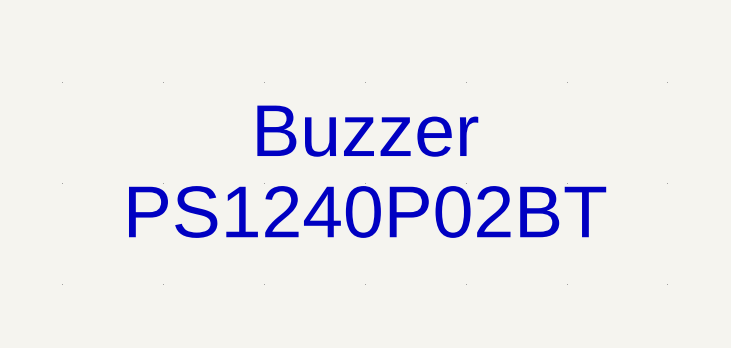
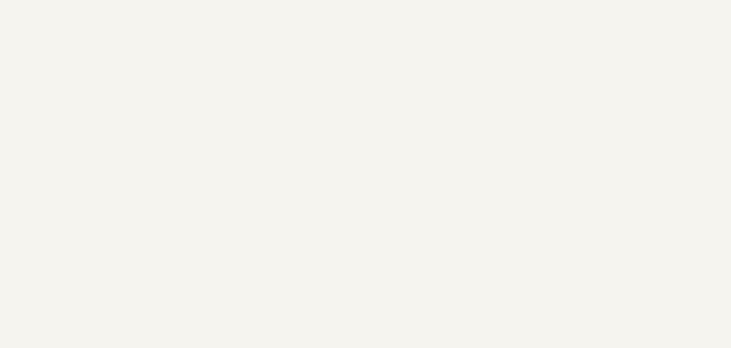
text: Buzzer (367, 131) -> none
text: PS1240P02BT (367, 211) -> none

